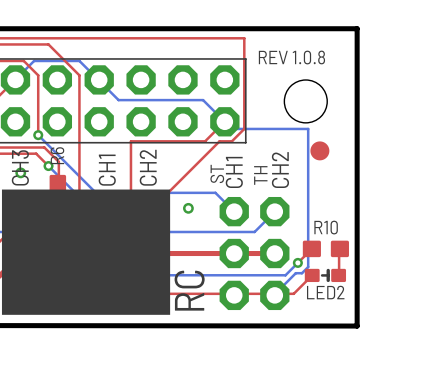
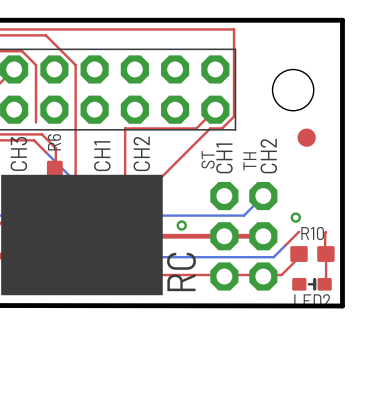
text: REV 1.0.8 (291, 57) -> none
bottom track: (15, 79) (34, 60) (79, 60) (118, 100) (203, 100) (231, 128) (308, 128) (308, 267) (302, 273) (295, 273) (274, 295) -> none
bottom track: (38, 135) (95, 192) (215, 192) (234, 211) -> none
via: (38, 135) -> none
via: (48, 166) -> none
via: (20, 172) -> none
via position: (188, 208) -> (181, 225)
via: none -> (295, 217)
R10 position: (325, 248) -> (312, 254)
via: (297, 262) -> none
top track: none -> (325, 254) (324, 284)
LED2 position: (325, 275) -> (311, 284)

